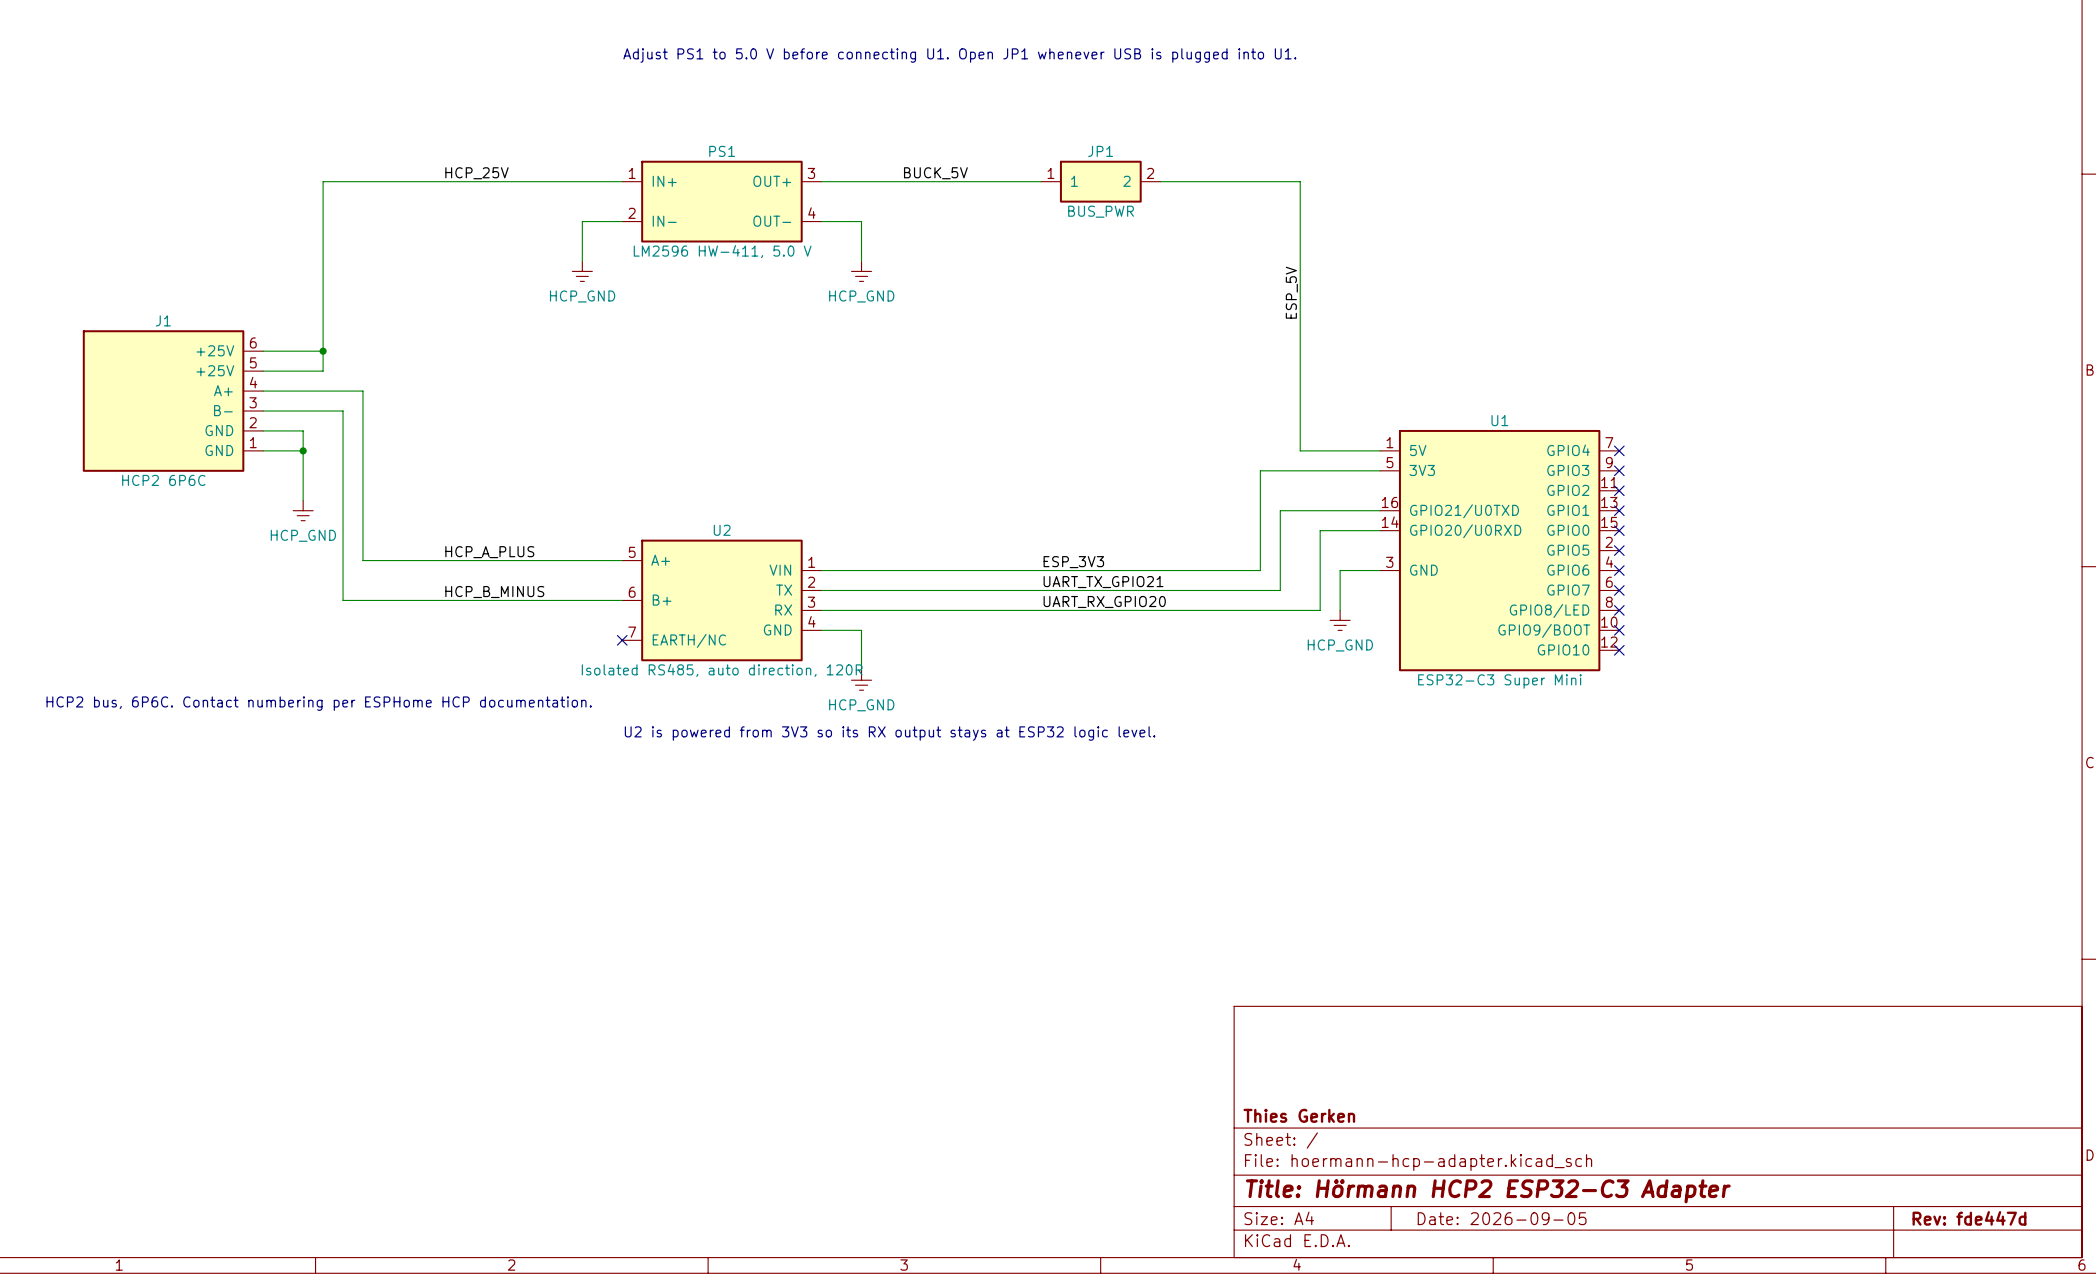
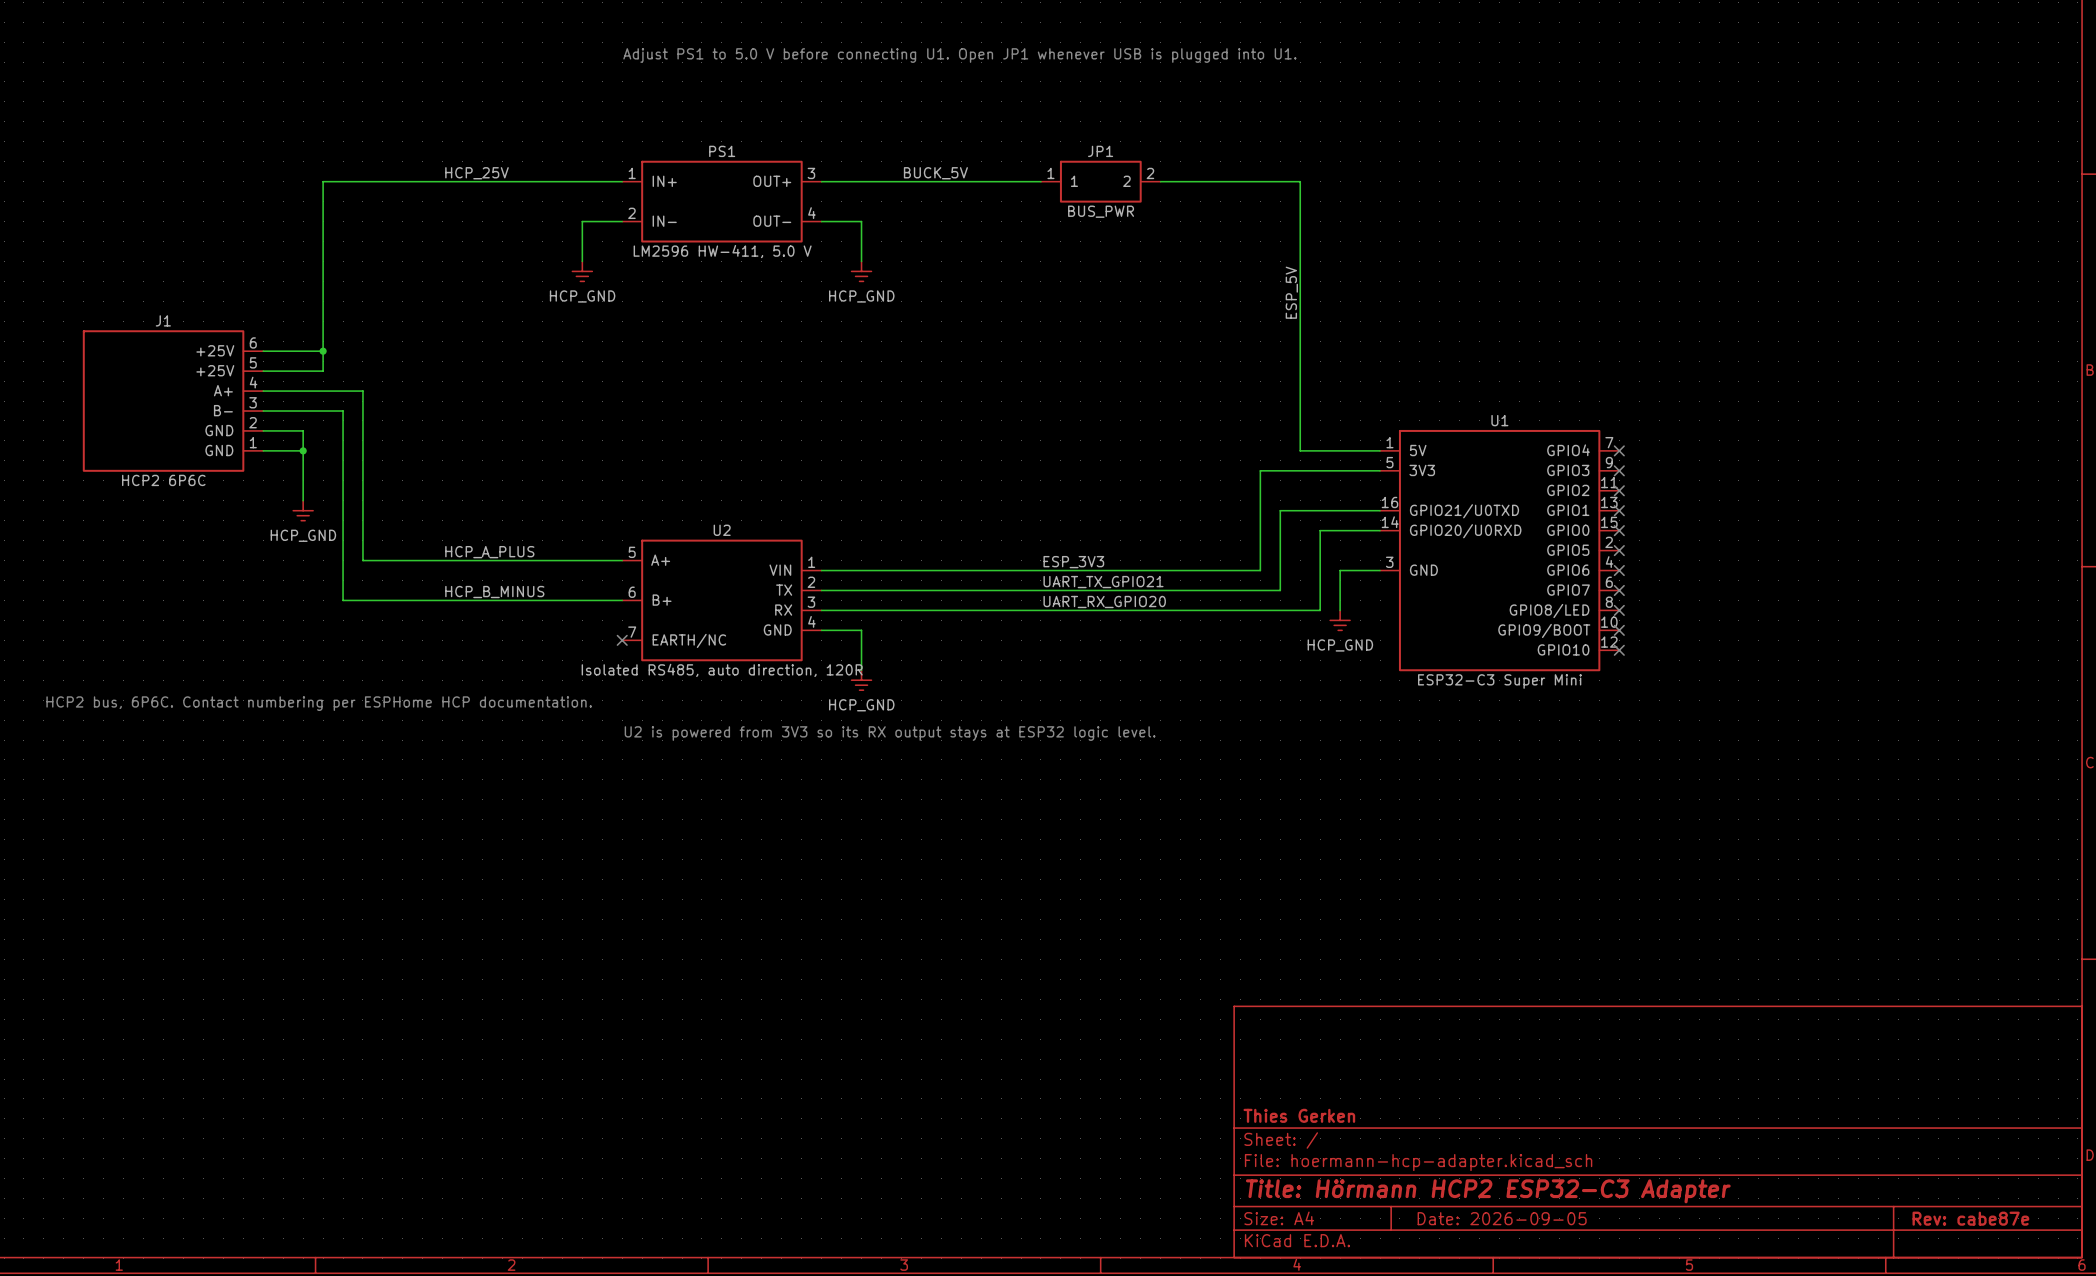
title block: Rev: fde447d (1969, 1218) -> Rev: cabe87e (1970, 1218)

